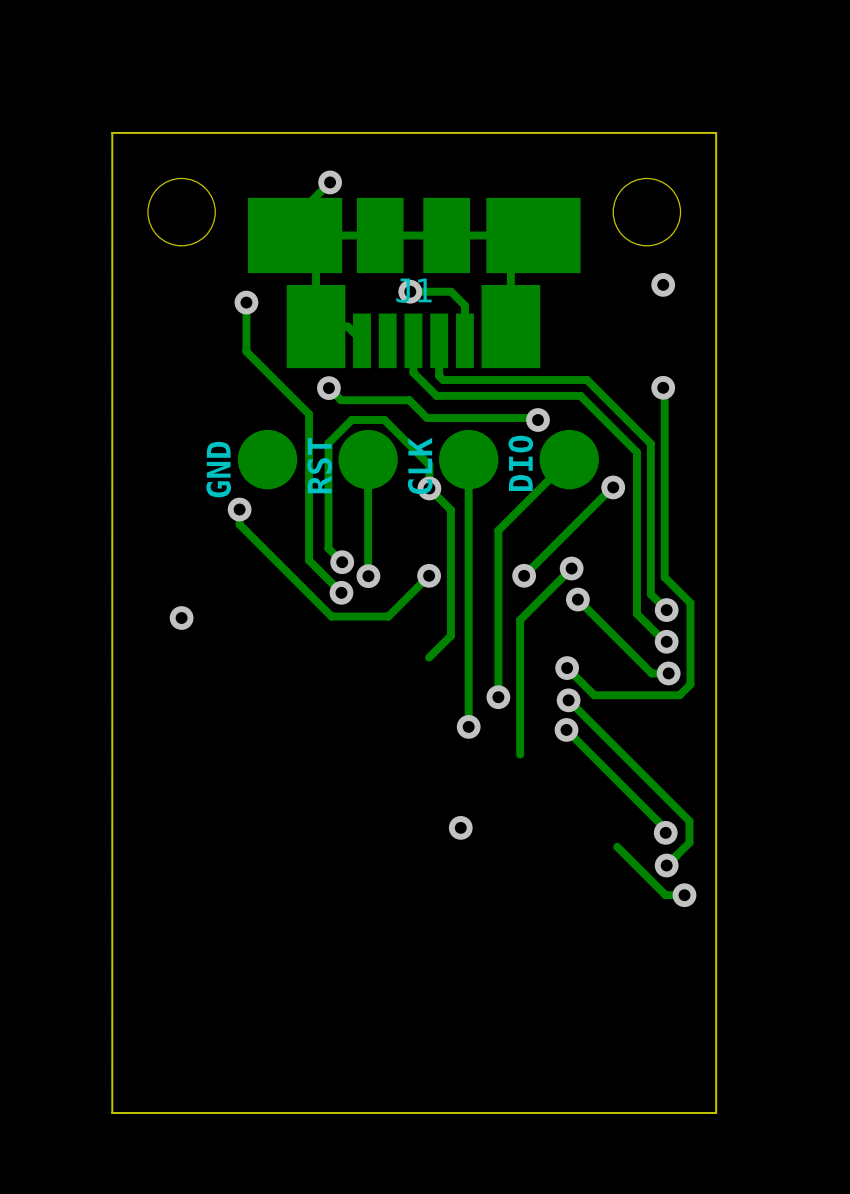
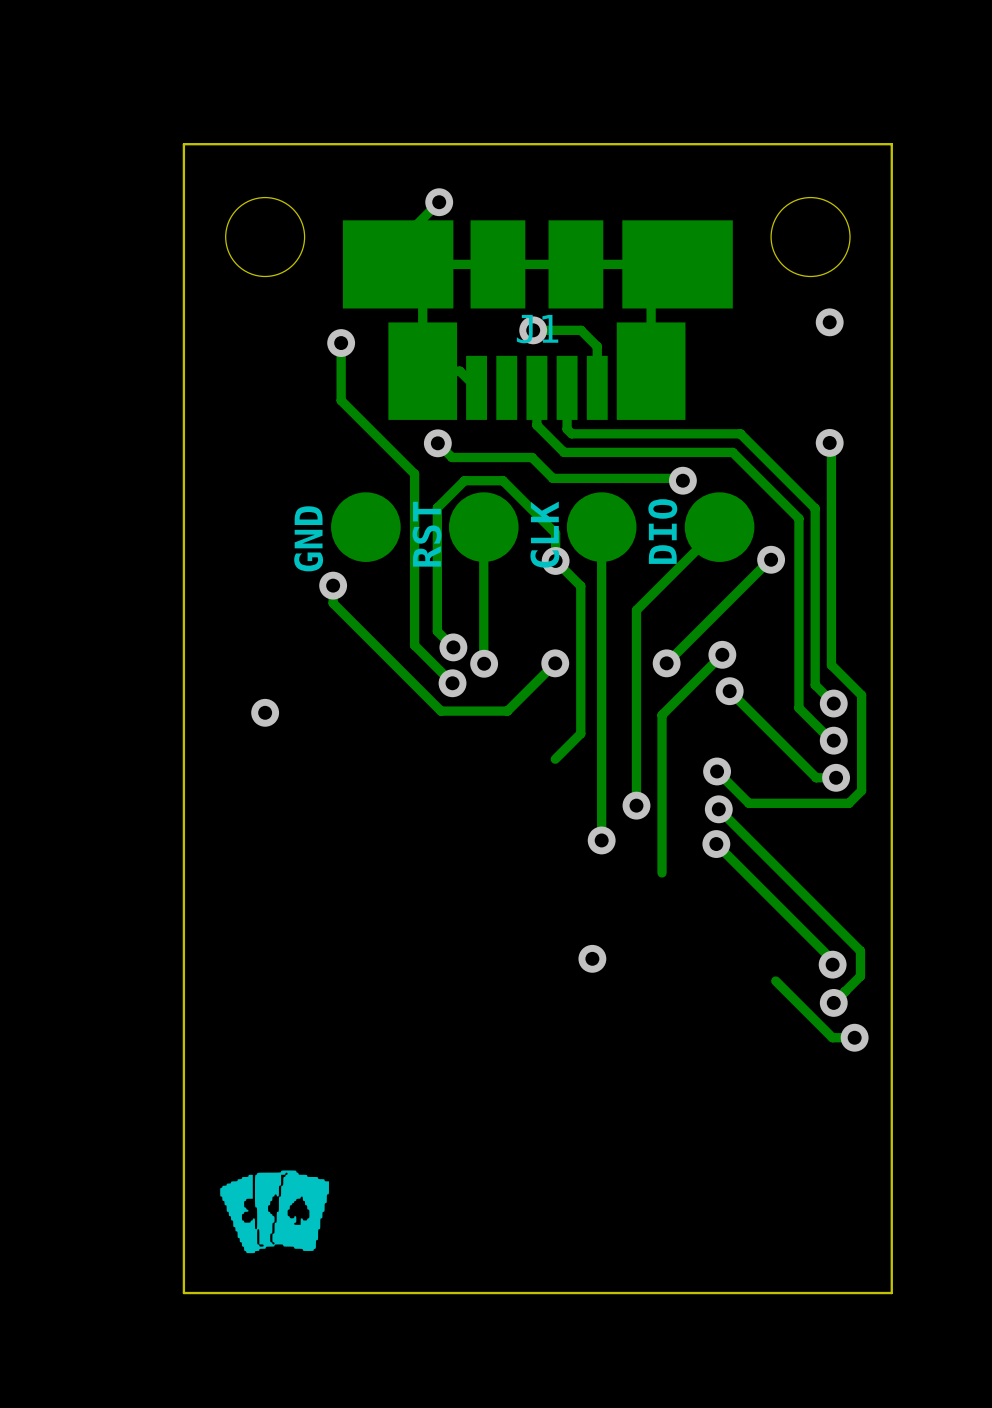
drawing: none -> [220, 1170, 329, 1254]

